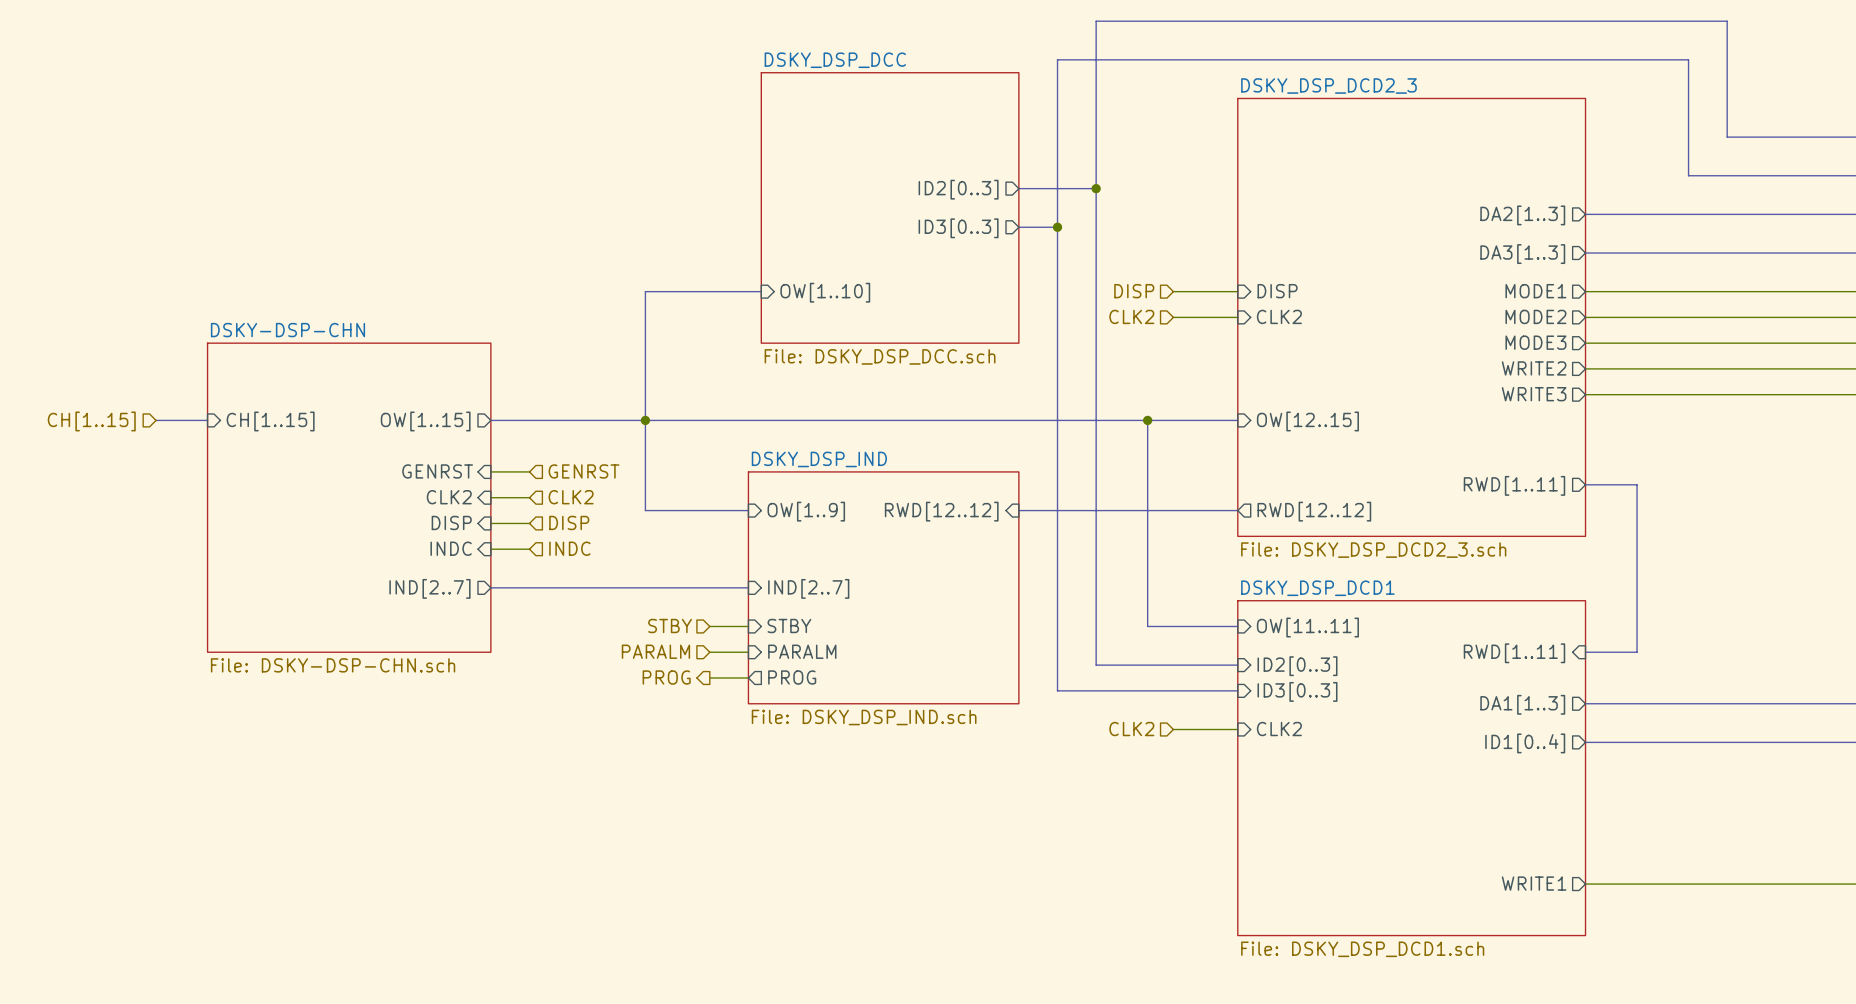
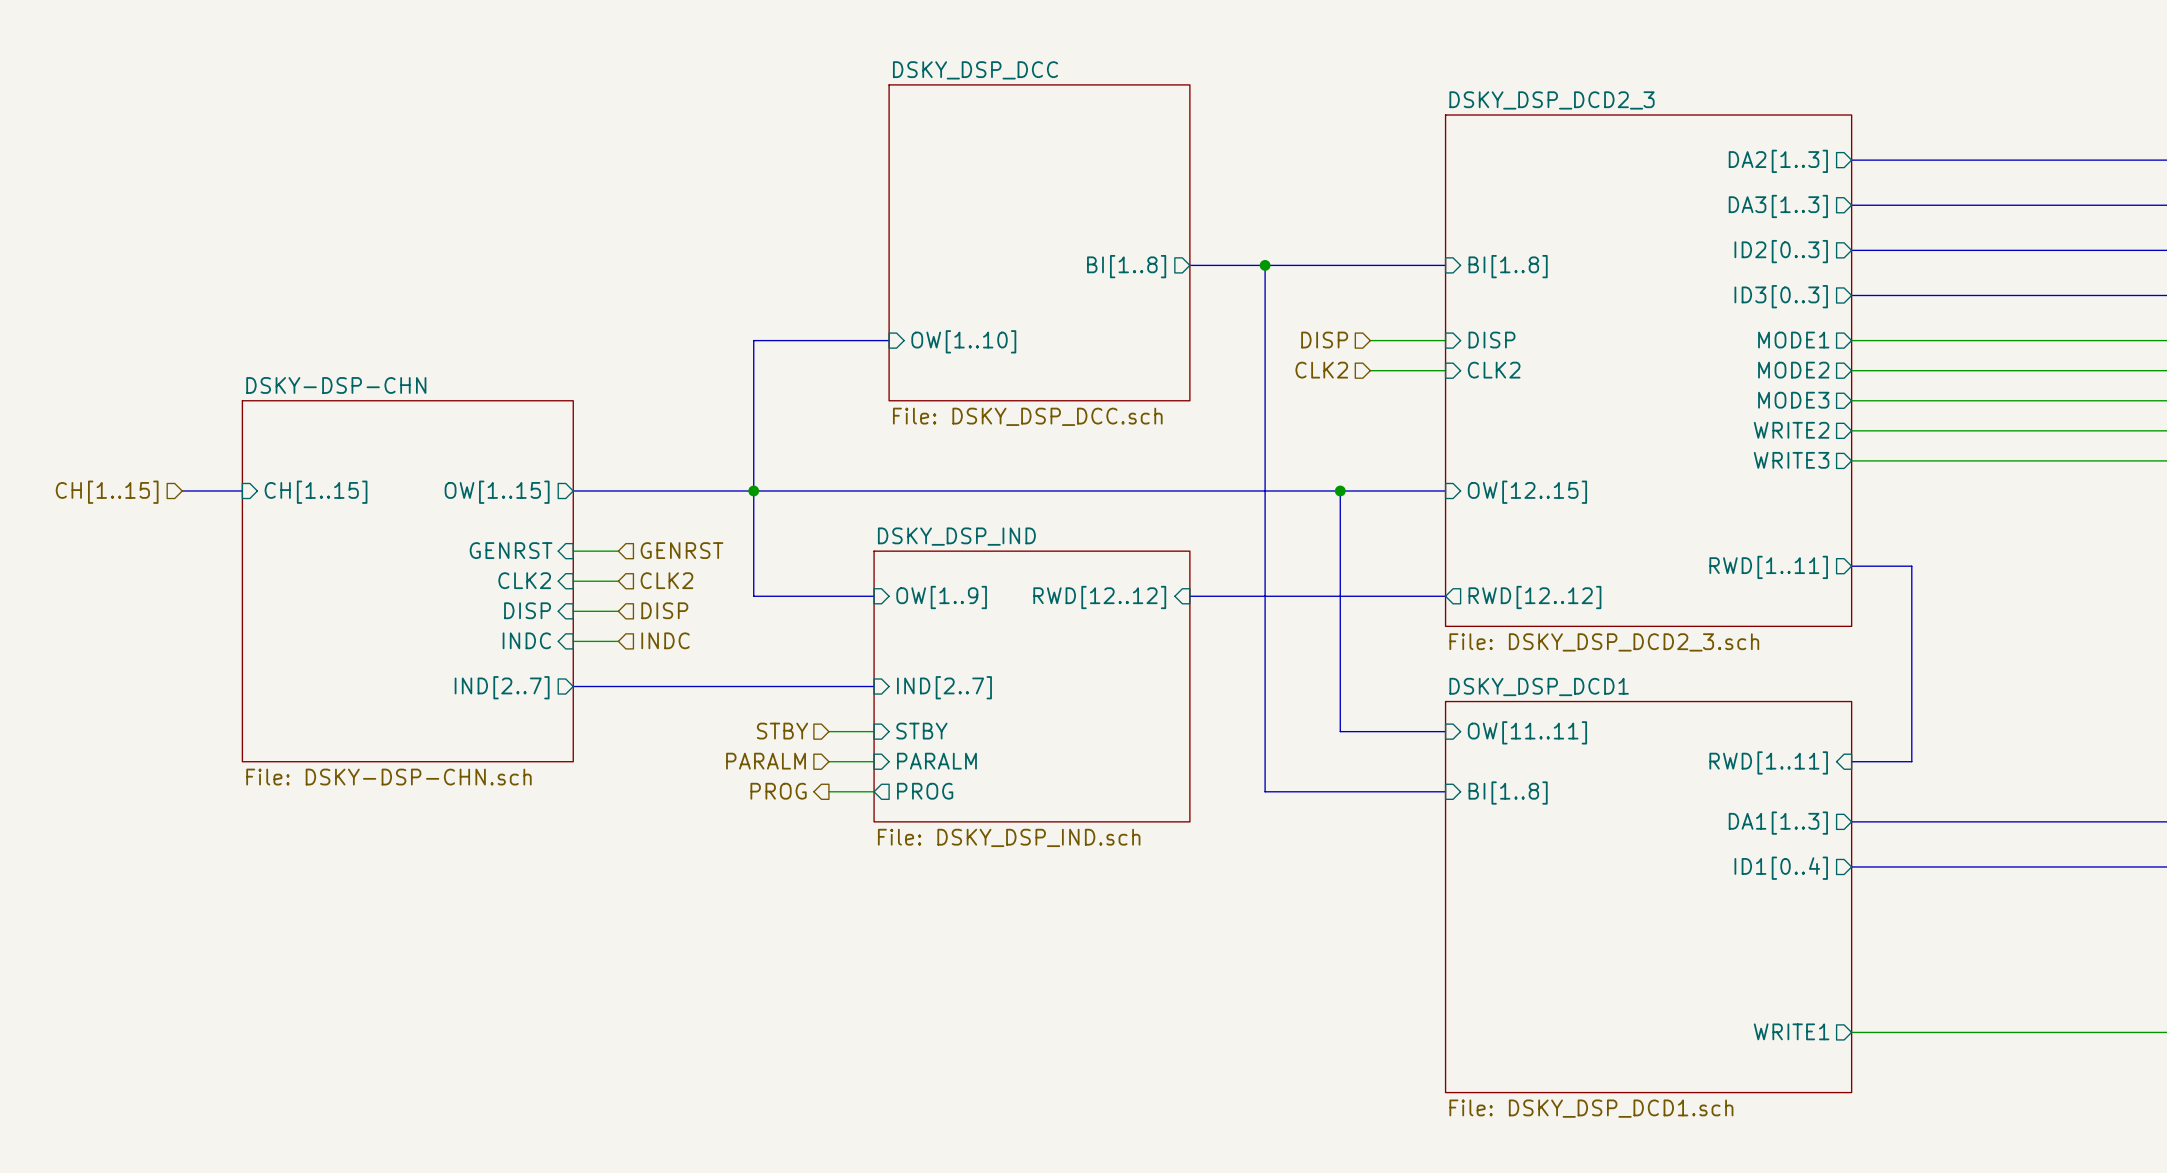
bus: (1727, 137) (1727, 21) (1096, 21) (1096, 665) (1237, 665) -> (2017, 160) (1851, 160)
sheet pin: none -> DA2[1..3] (1778, 161)
bus: (1688, 175) (1688, 59) (1057, 59) (1057, 690) (1237, 690) -> (1971, 205) (1851, 205)
sheet pin: none -> DA3[1..3] (1778, 206)
bus: (1018, 188) (1096, 188) -> none
junction: (1096, 188) -> none
sheet pin: ID2[0..3] (958, 189) -> none
sheet pin: DA2[1..3] (1522, 215) -> ID2[0..3] (1781, 251)
bus: none -> (1235, 265) (1445, 265)
junction: (1057, 227) -> none
bus: none -> (1265, 265) (1265, 791) (1445, 791)
junction: none -> (1265, 265)
sheet pin: ID3[0..3] (958, 228) -> BI[1..8] (1126, 266)
sheet pin: none -> BI[1..8] (1508, 266)
sheet pin: DA3[1..3] (1522, 254) -> ID3[0..3] (1781, 296)
sheet pin: ID2[0..3] (1297, 666) -> none
sheet pin: none -> BI[1..8] (1508, 793)
sheet pin: ID3[0..3] (1297, 691) -> none
hierarchical label: CLK2 (1131, 729) -> none
wire: (1173, 729) (1237, 729) -> none
sheet pin: CLK2 (1279, 729) -> none

